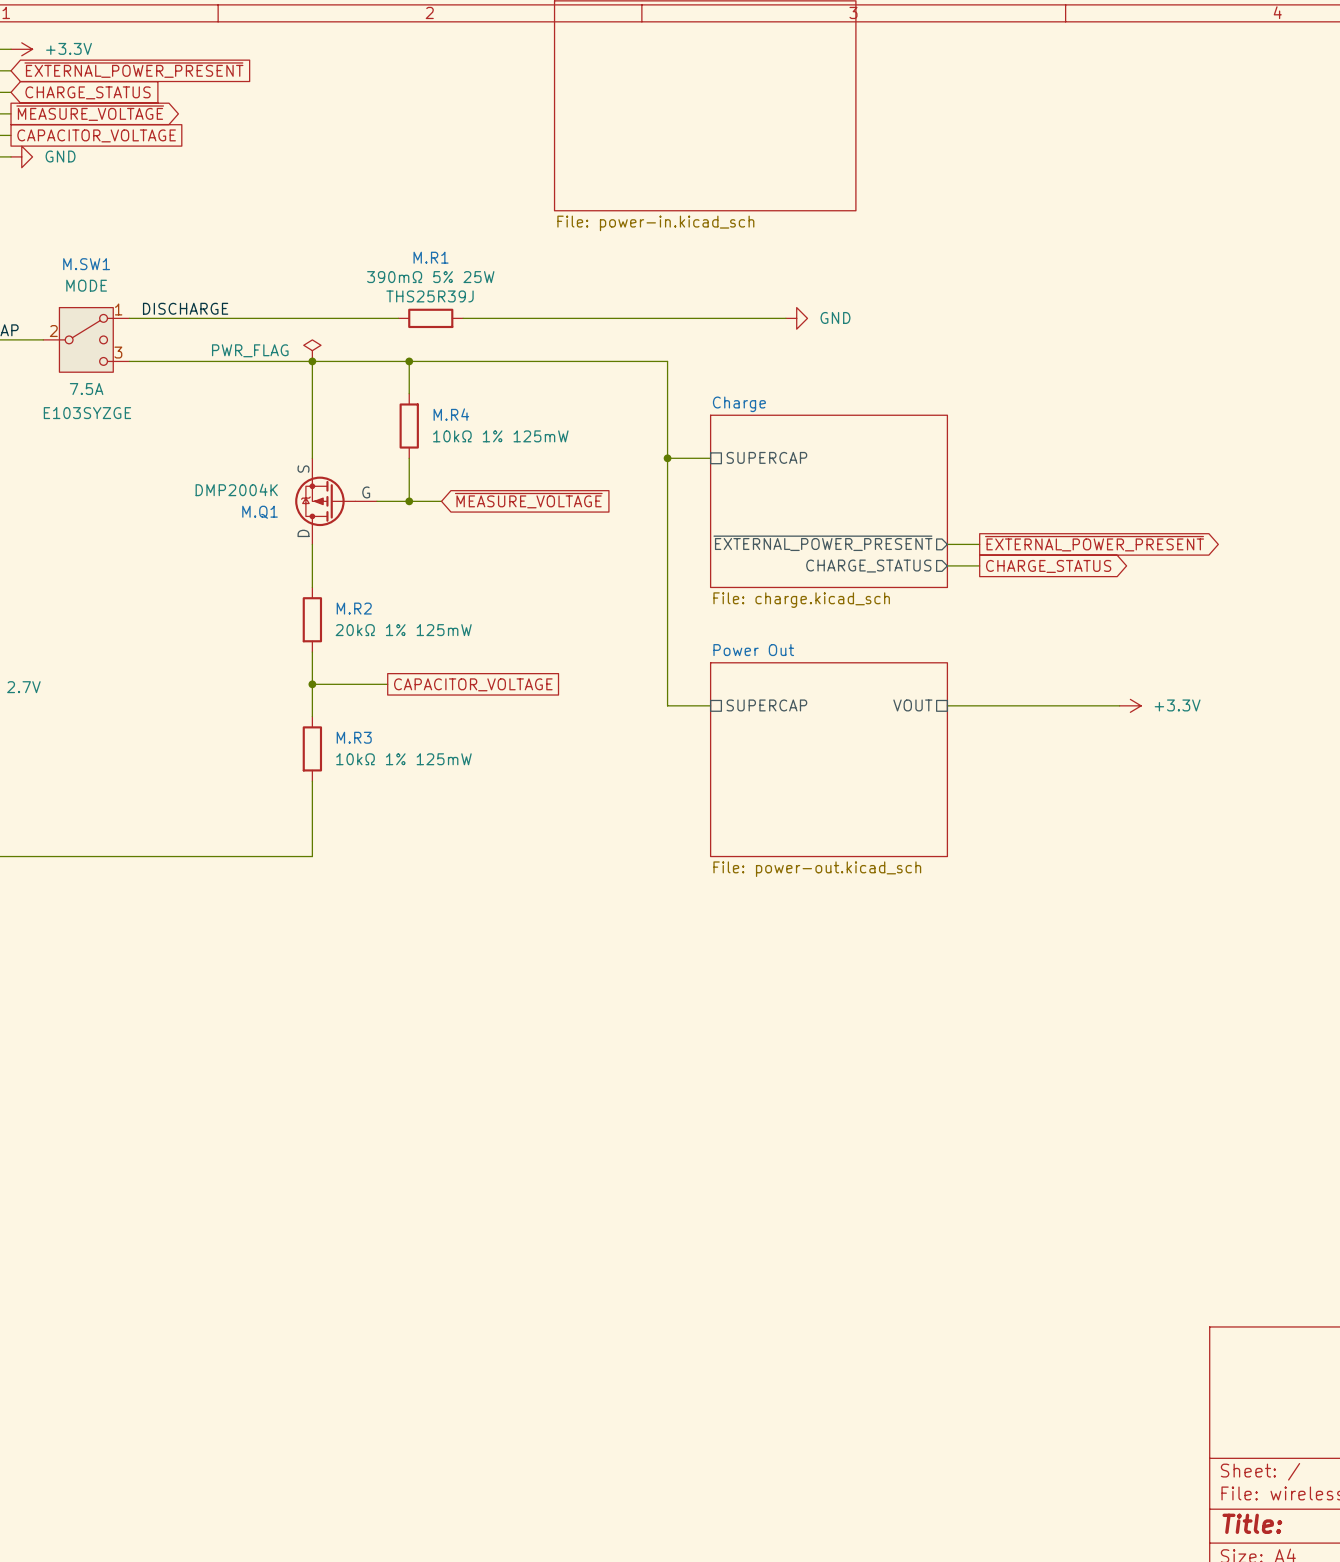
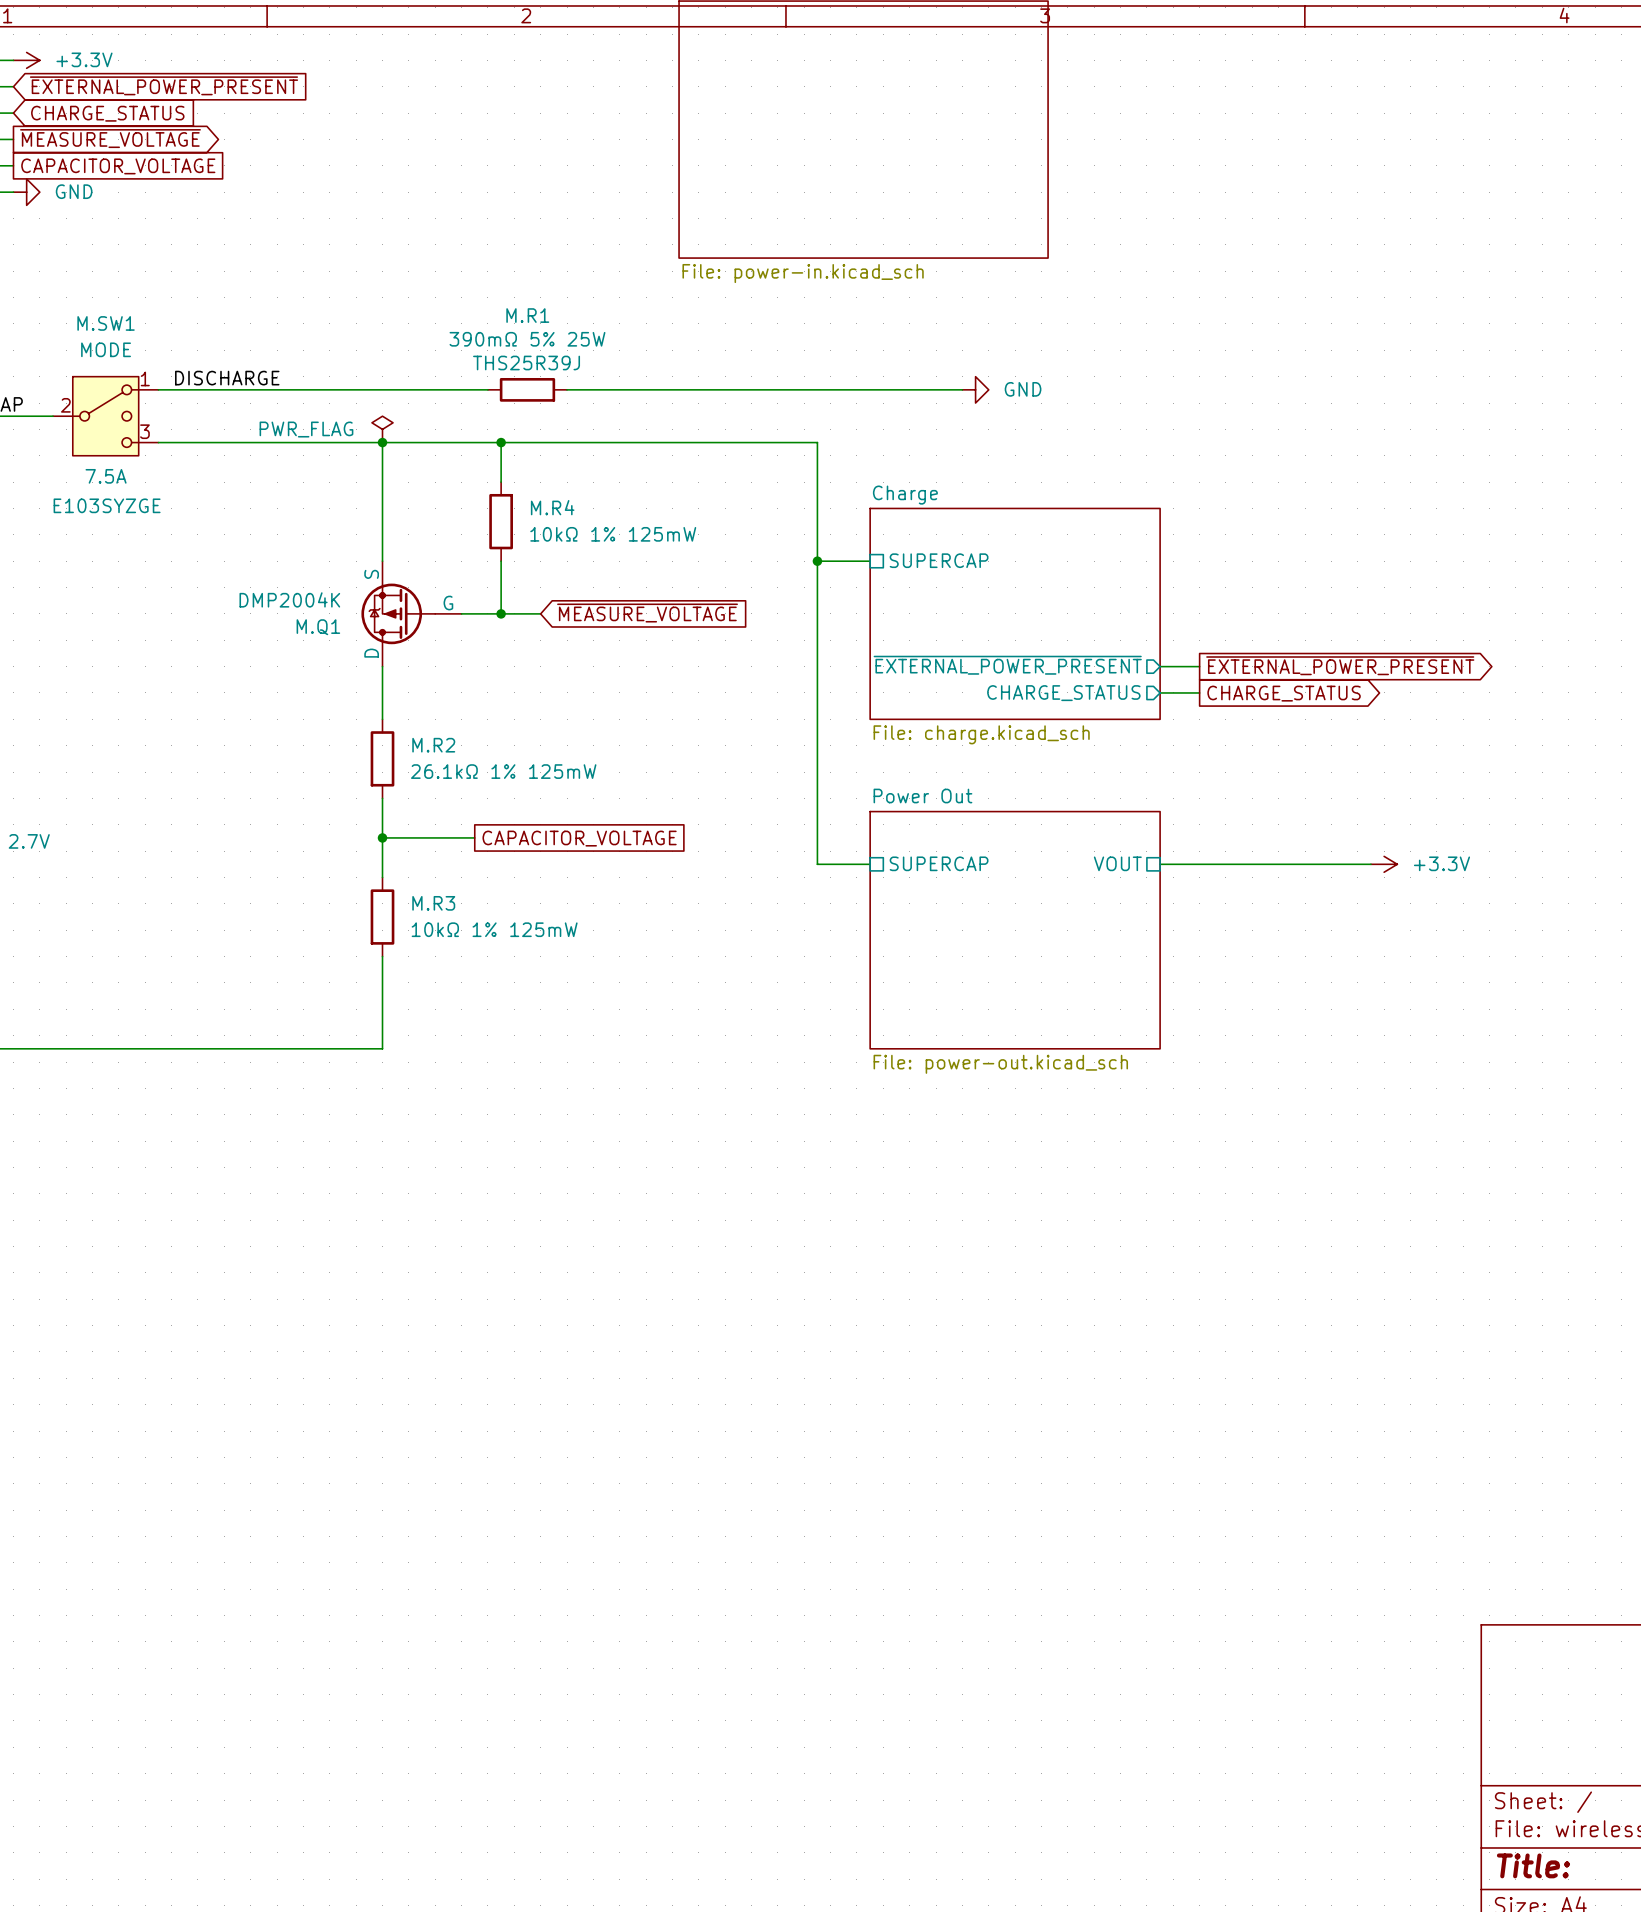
M.R2 value: 20kΩ 1% 125mW (403, 630) -> 26.1kΩ 1% 125mW (503, 771)

